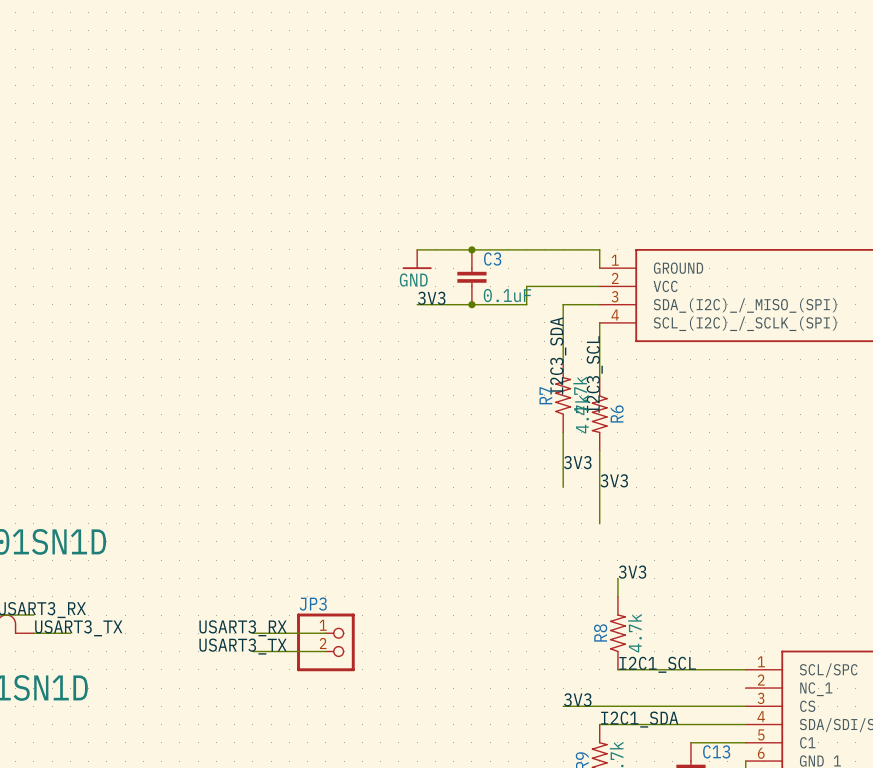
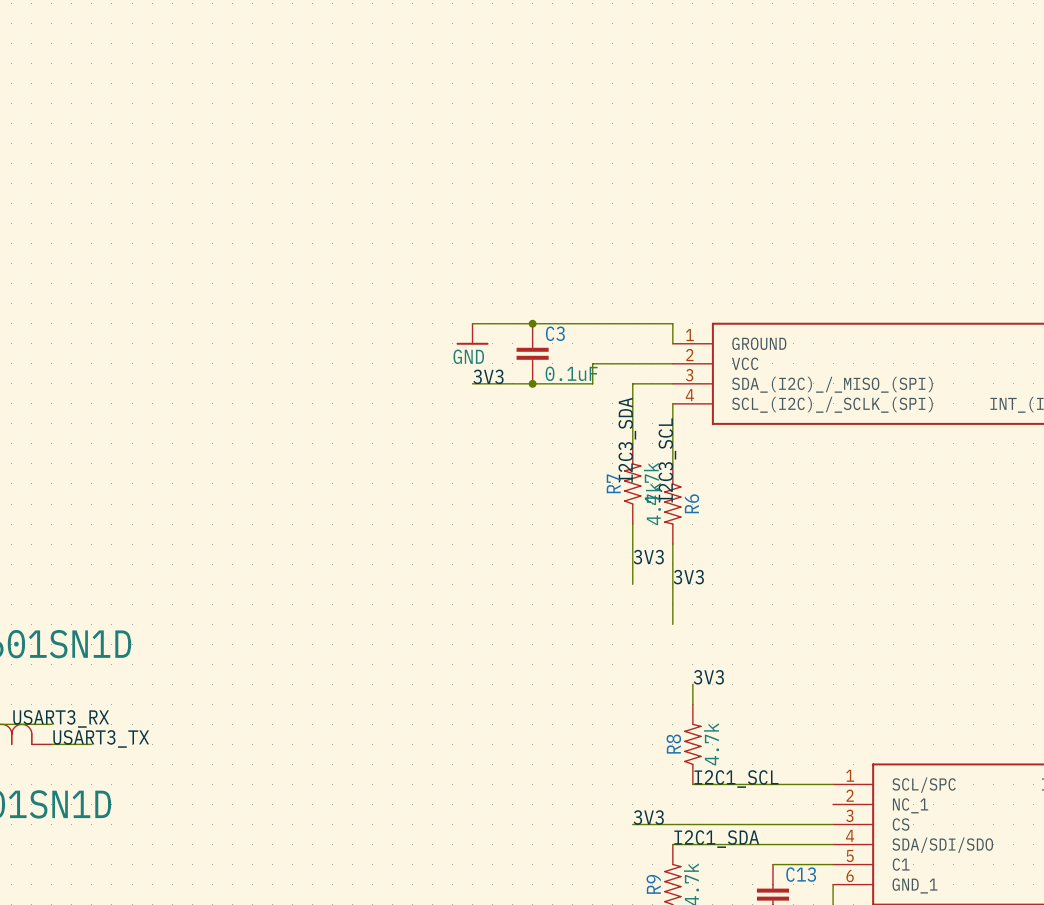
label: USART3_RX (243, 628) -> none
wire: (252, 633) (325, 633) -> none
JP3: (325, 642) -> none
label: USART3_TX (243, 646) -> none
wire: (252, 651) (325, 651) -> none

